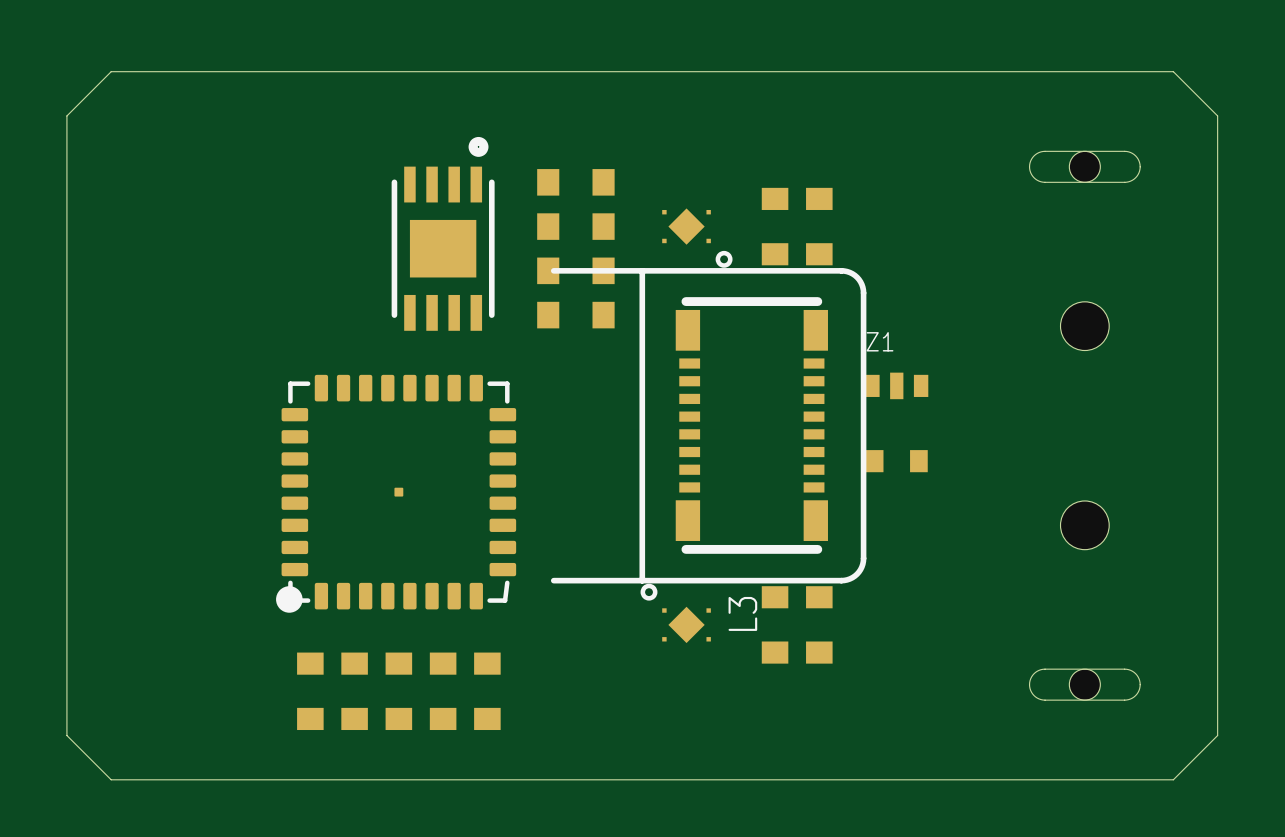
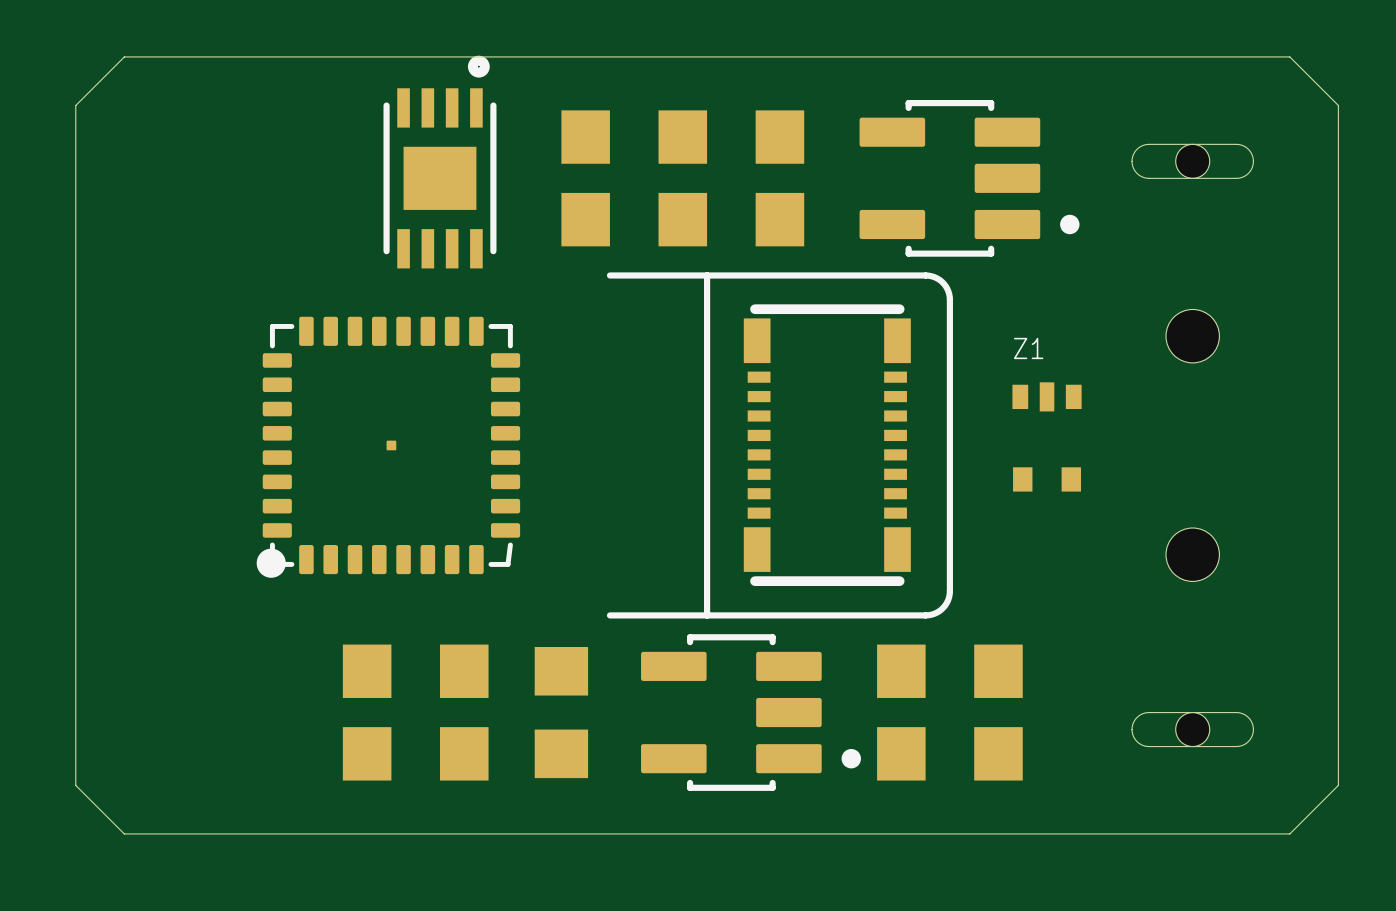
part: none -> (585, 178)
part: (575, 182) -> none
part: none -> (682, 178)
part: none -> (779, 178)
part: none -> (969, 178)
part: (575, 226) -> none
part: (775, 226) -> none
part: (819, 226) -> none
part position: (443, 233) -> (439, 162)
part: (697, 238) -> none
part: (575, 270) -> none
part: (575, 315) -> none
Z1 position: (896, 422) -> (1047, 436)
part position: (396, 493) -> (388, 447)
L3: (675, 613) -> none
part: (775, 624) -> none
part: (819, 624) -> none
part footprint: [474, 652, 501, 731] -> [534, 646, 589, 779]
part: none -> (367, 712)
part: none -> (464, 712)
part: none -> (751, 712)
part: none -> (901, 712)
part: none -> (998, 712)
part: (310, 691) -> none
part: (354, 691) -> none
part: (398, 691) -> none
part: (443, 691) -> none

